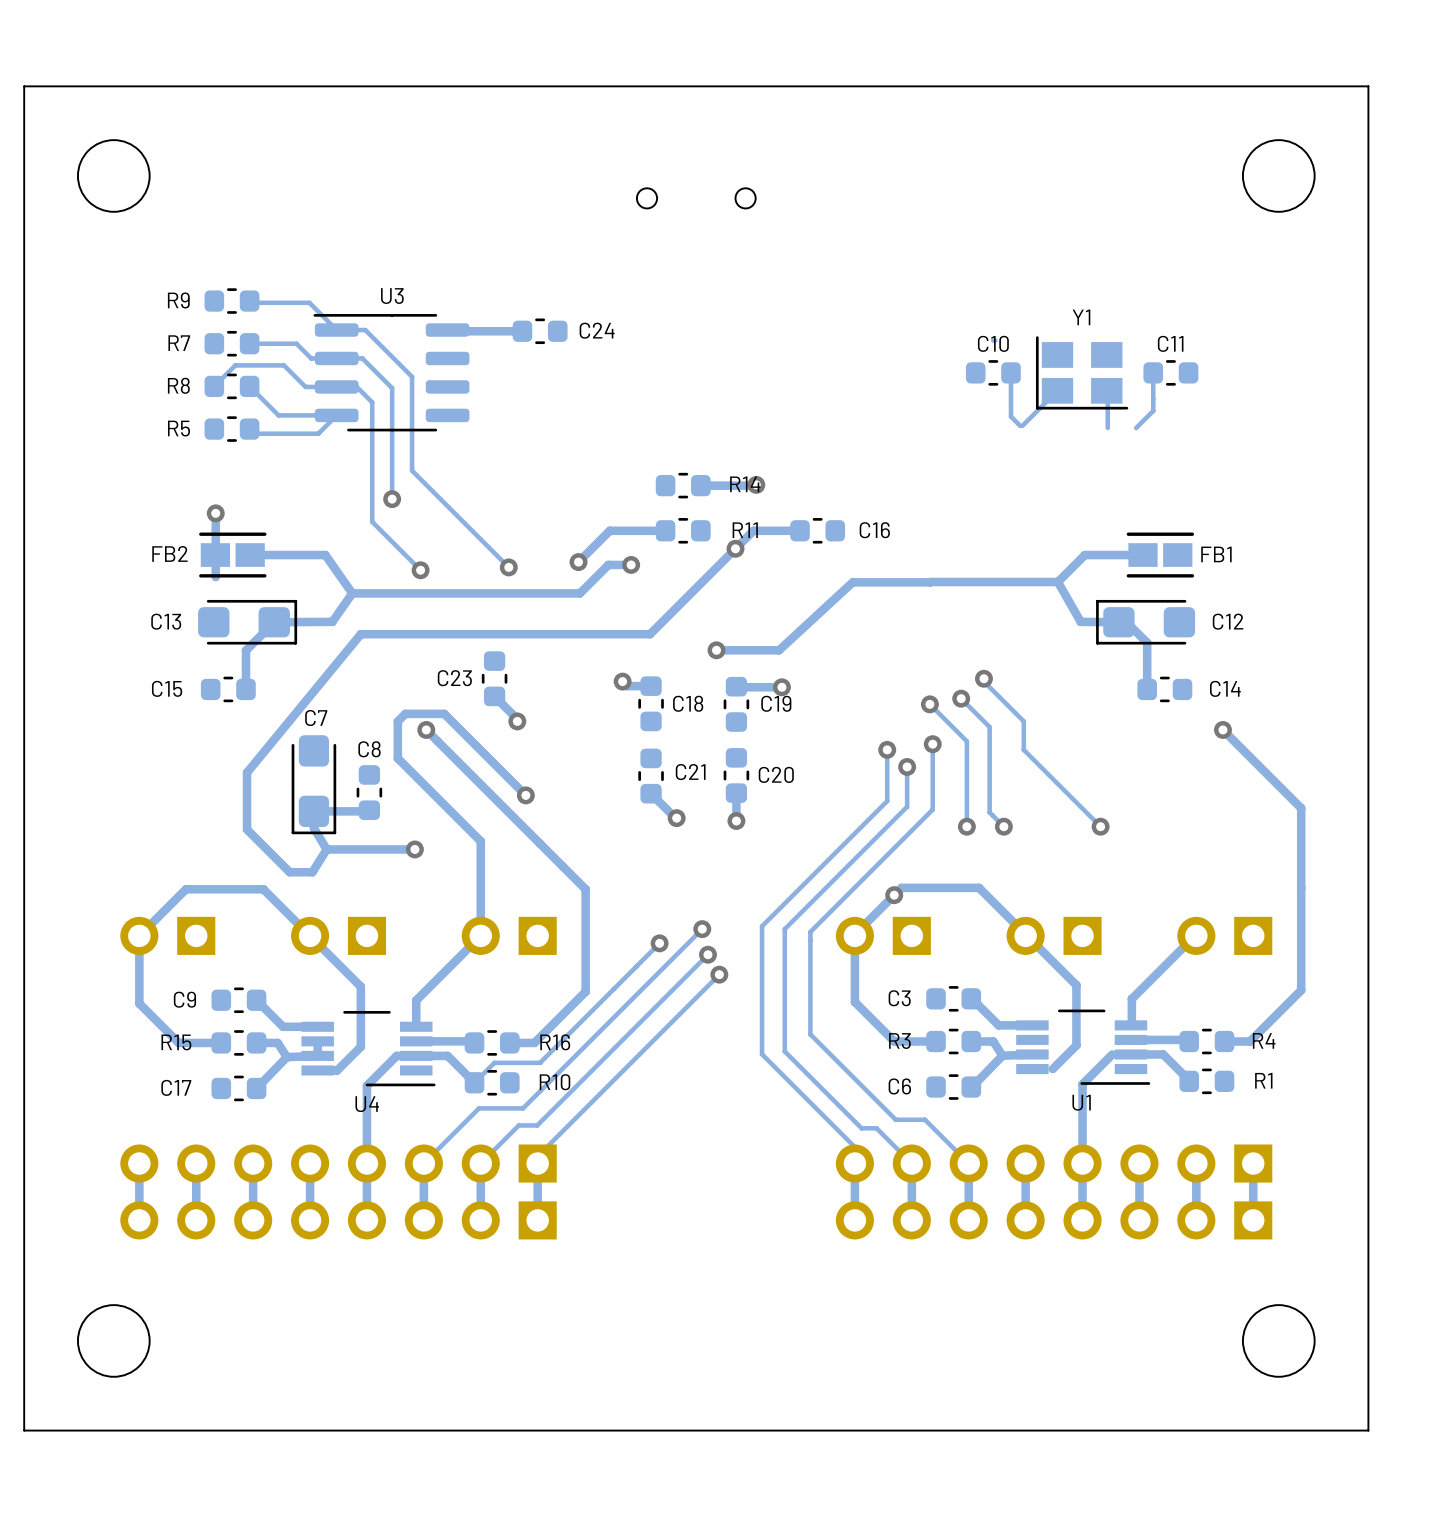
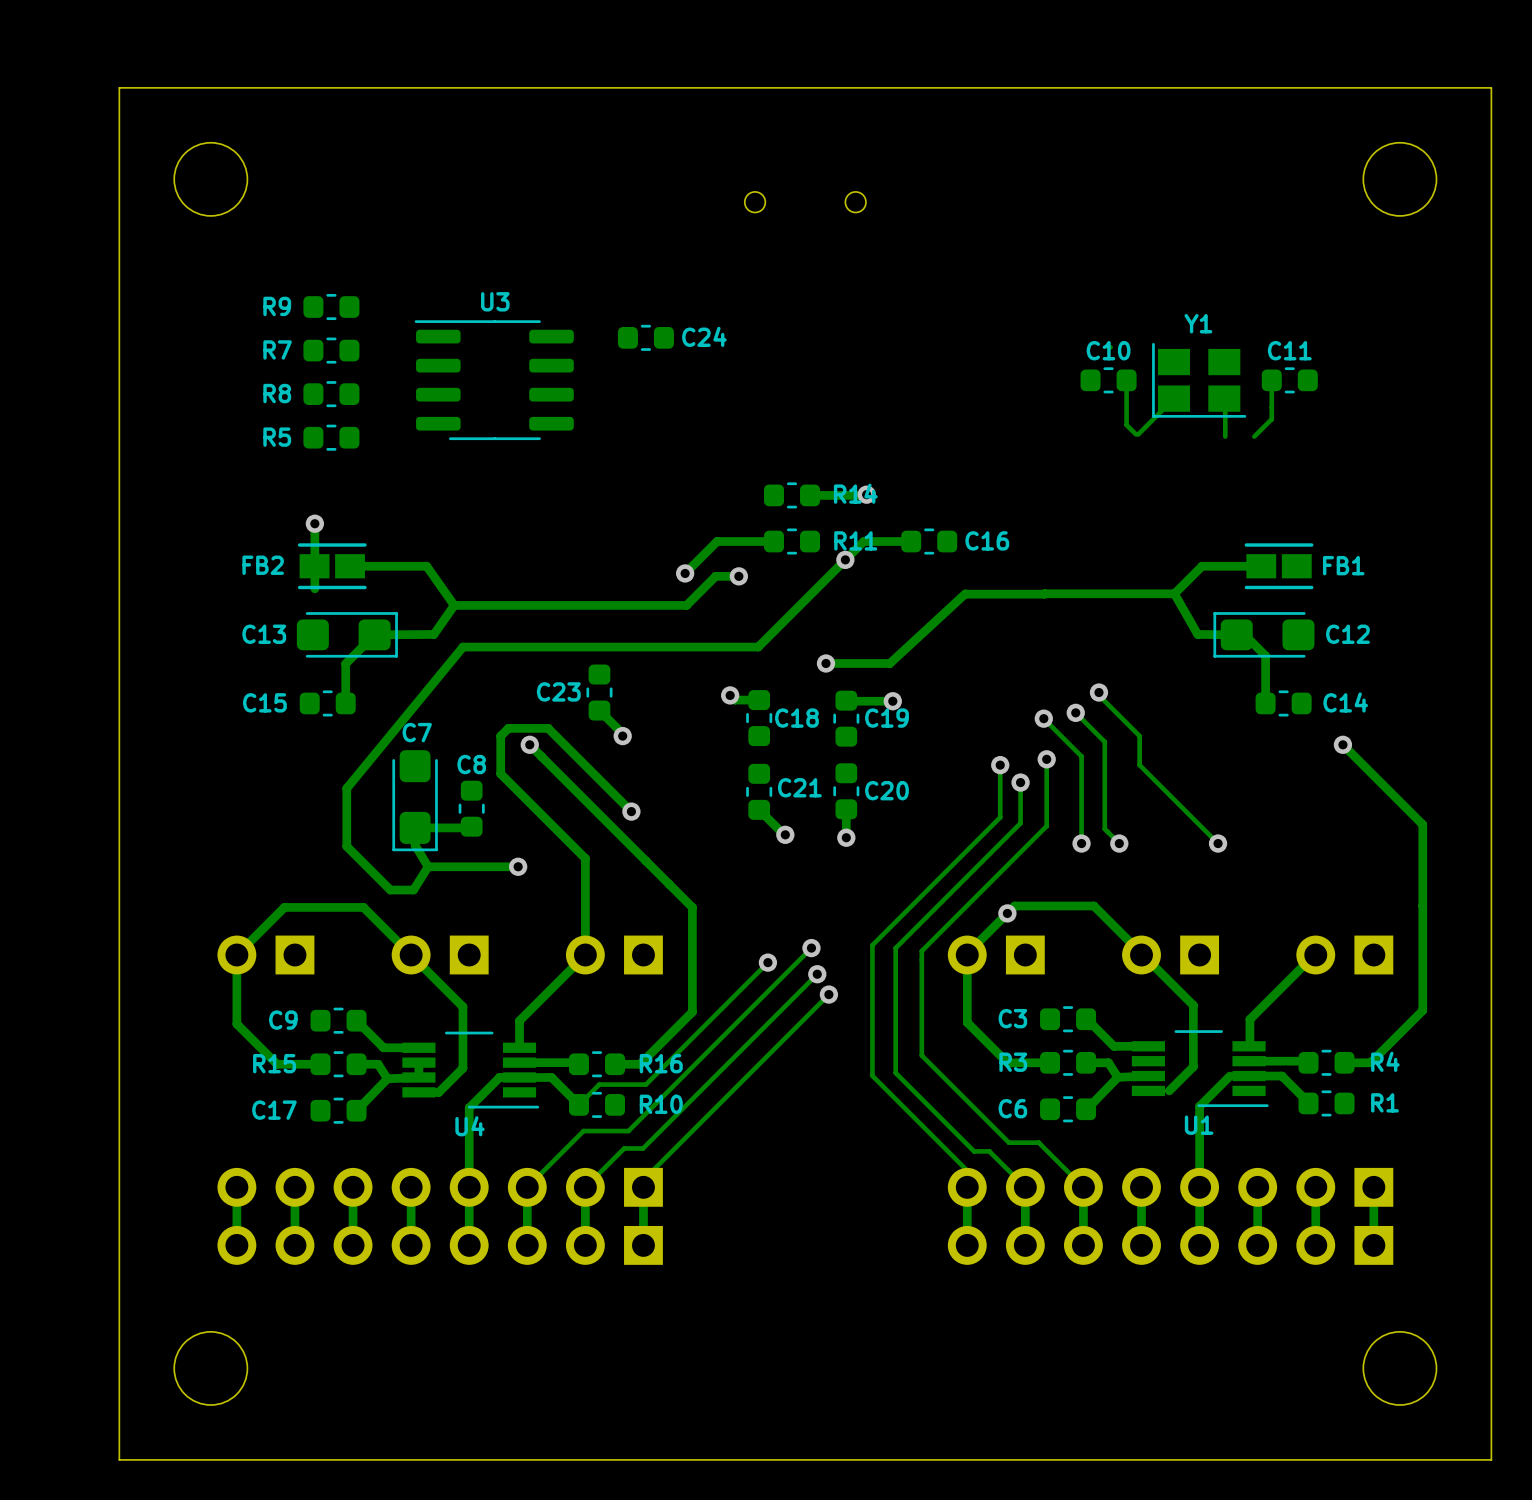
track: (249, 301) (251, 302) (309, 302) (336, 330) (365, 330) (412, 376) (412, 470) (508, 567) -> none
track: (447, 330) (522, 331) -> none
track: (249, 343) (296, 343) (311, 358) (362, 358) (392, 388) (392, 499) -> none
track: (214, 386) (235, 365) (284, 365) (305, 386) (356, 386) (372, 402) (372, 521) (420, 570) -> none
track: (249, 388) (249, 386) (278, 415) (336, 415) (318, 433) (254, 433) (250, 428) -> none
via: (392, 499) -> none
via: (508, 567) -> none
via: (420, 570) -> none

